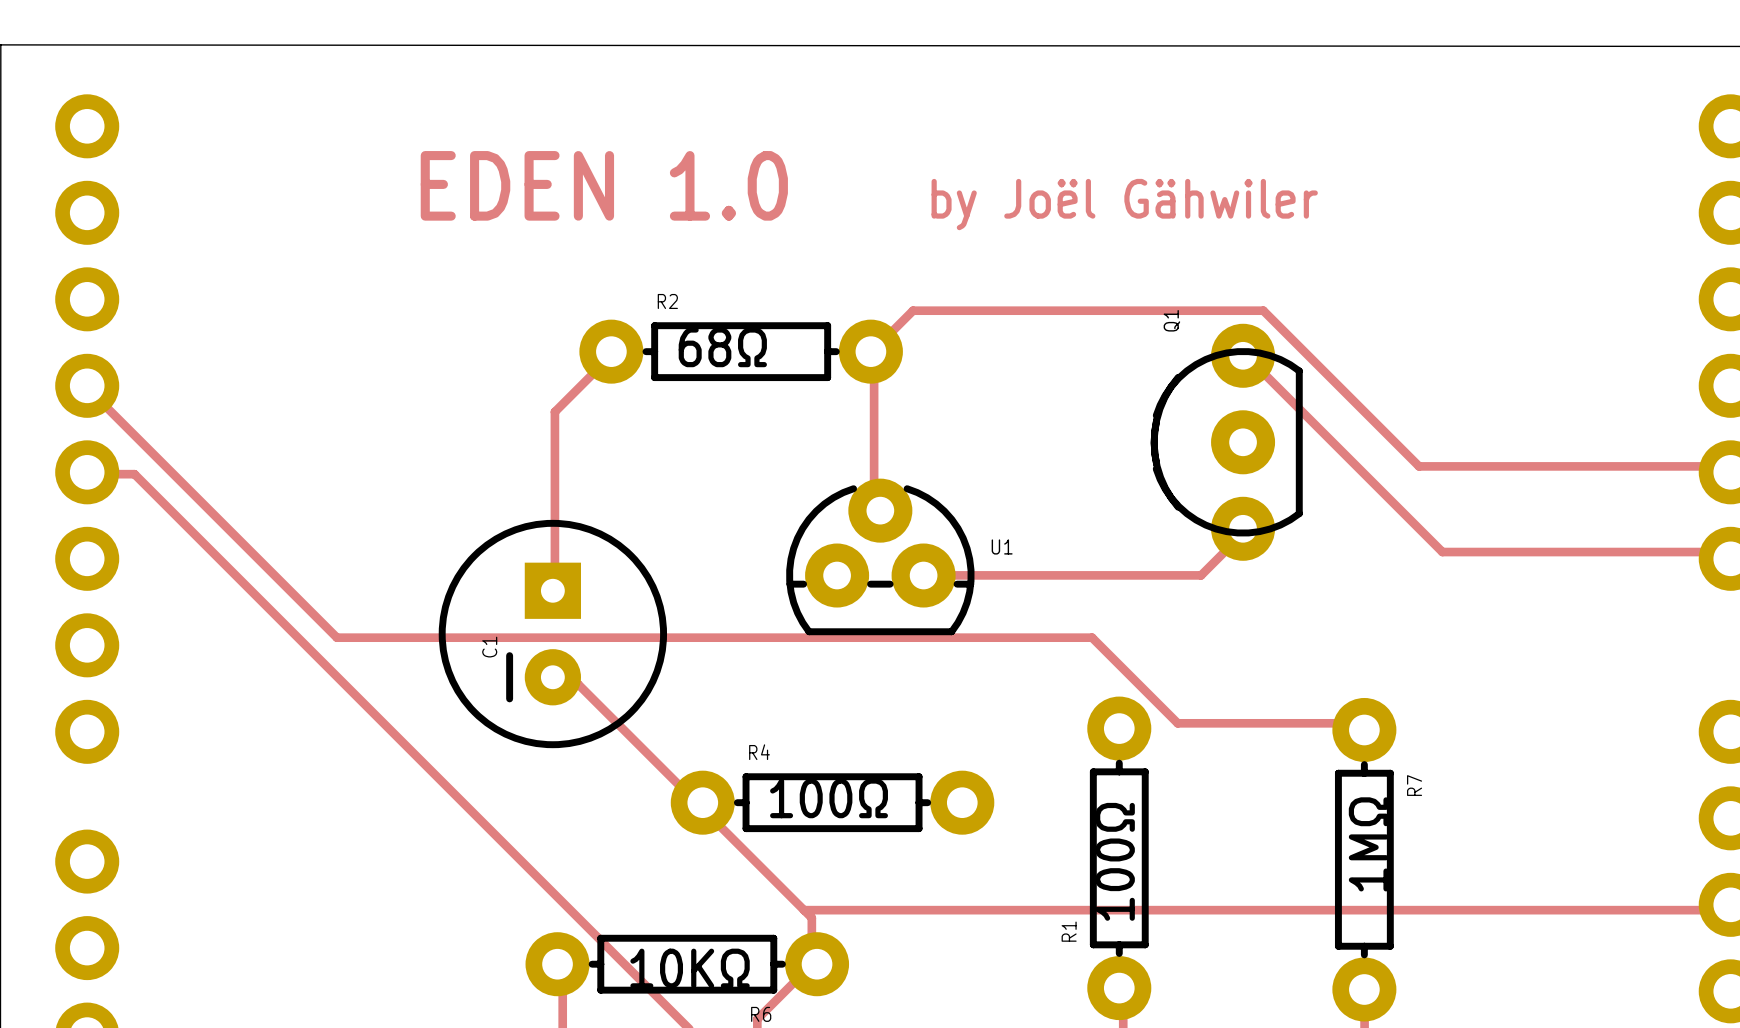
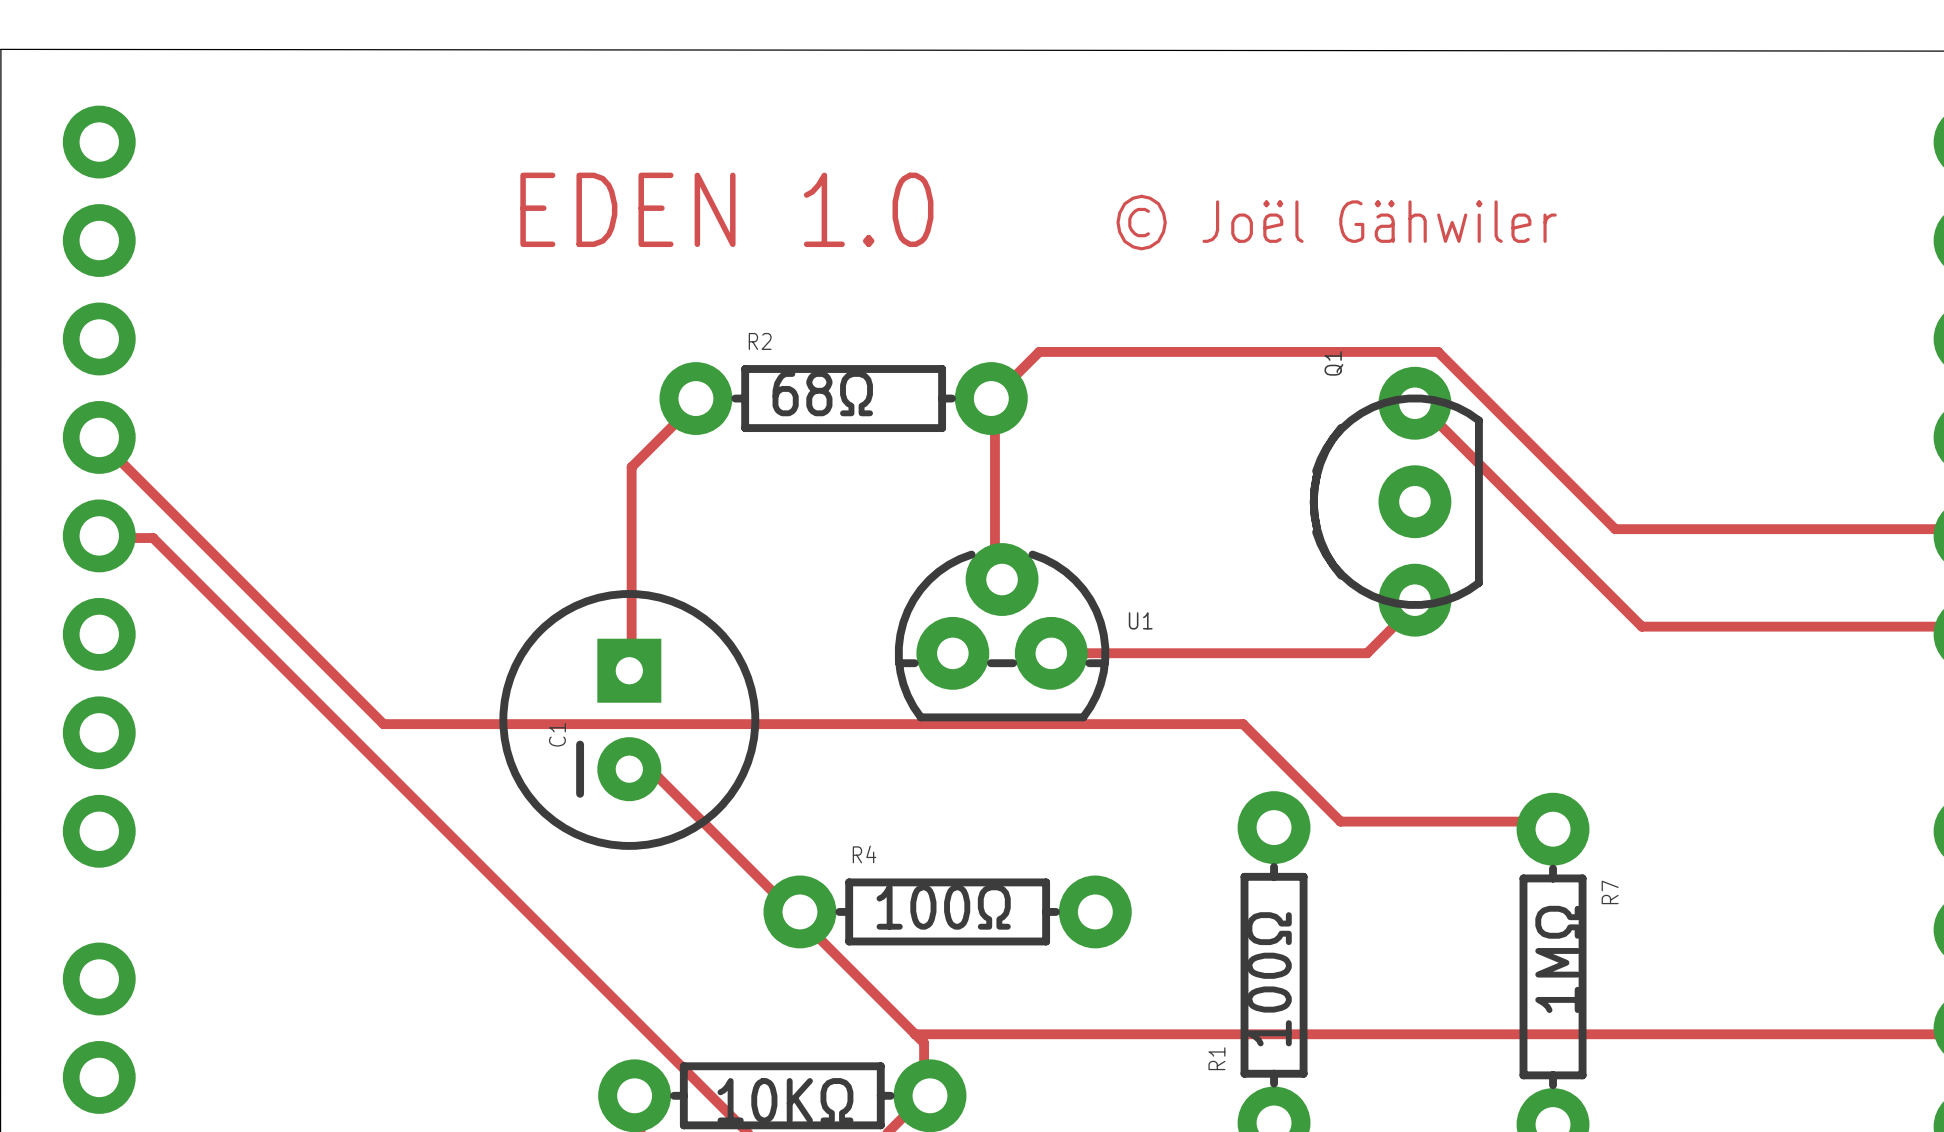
text position: EDEN 1.0 (604, 185) -> EDEN 1.0 (726, 209)
text: by Joël Gähwiler (1124, 204) -> © Joël Gähwiler (1336, 222)

